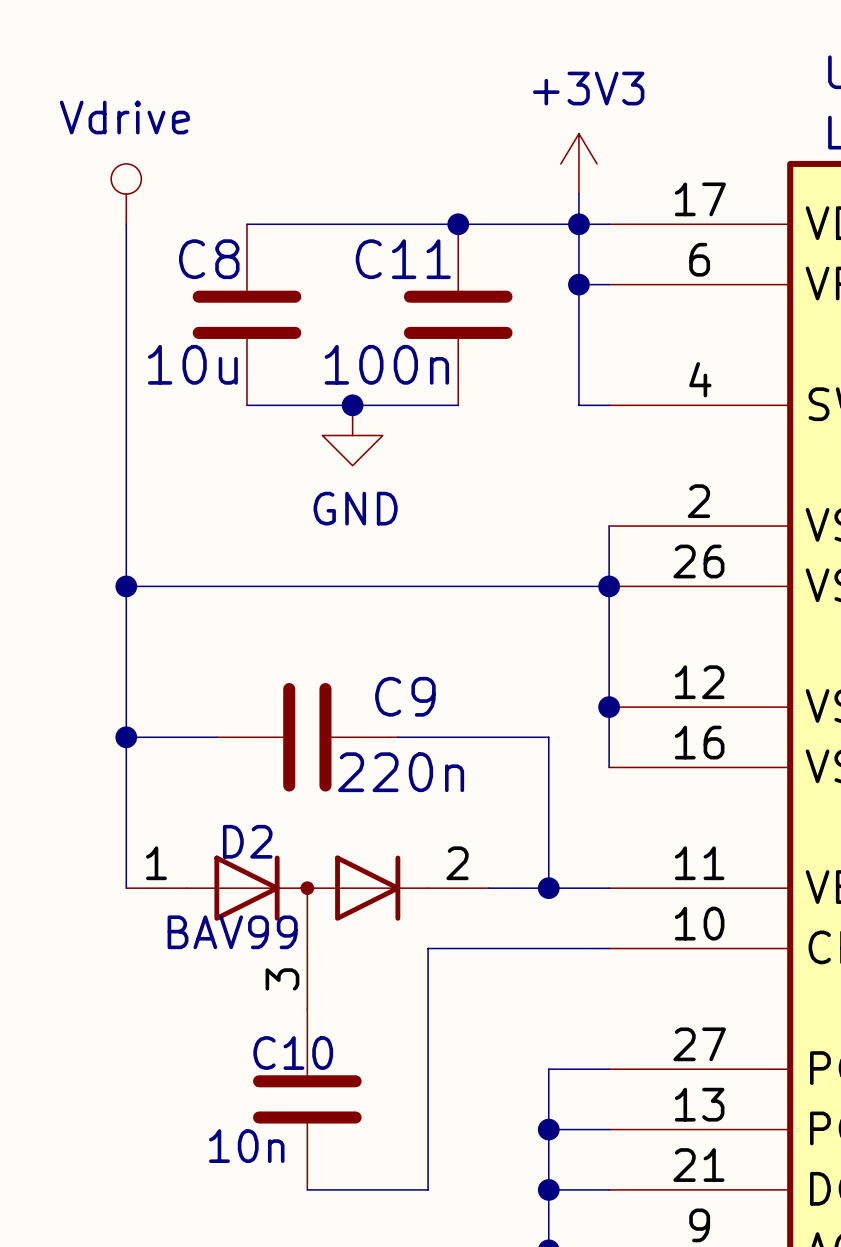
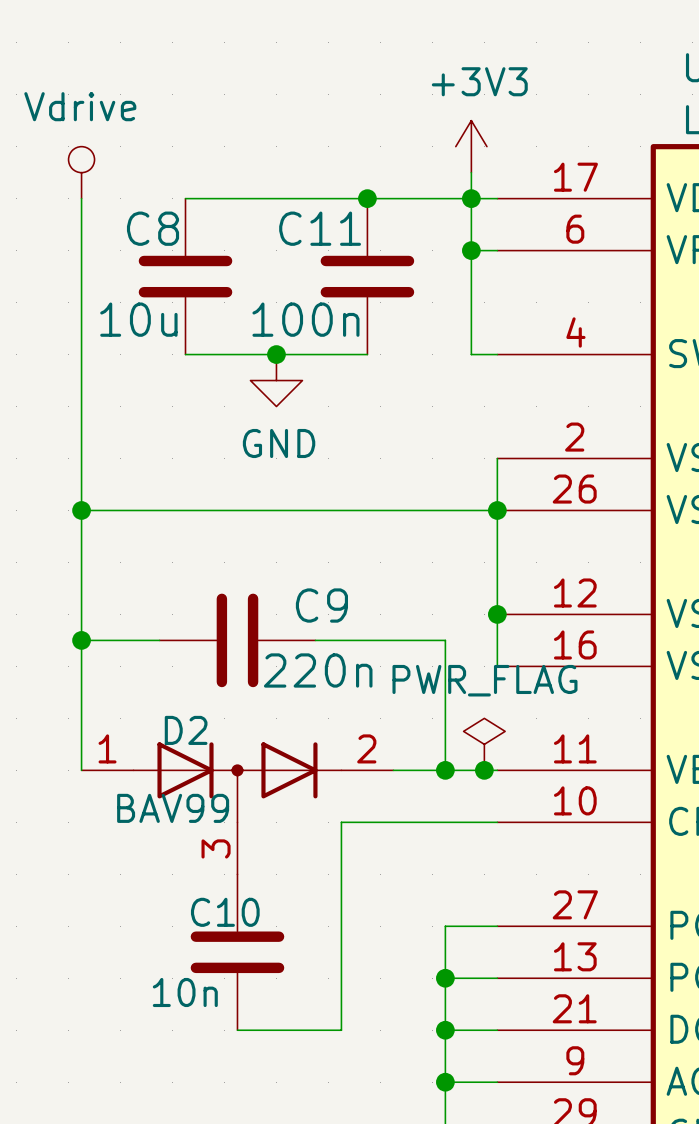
power symbol: none -> PWR_FLAG (484, 744)
junction: none -> (484, 770)

